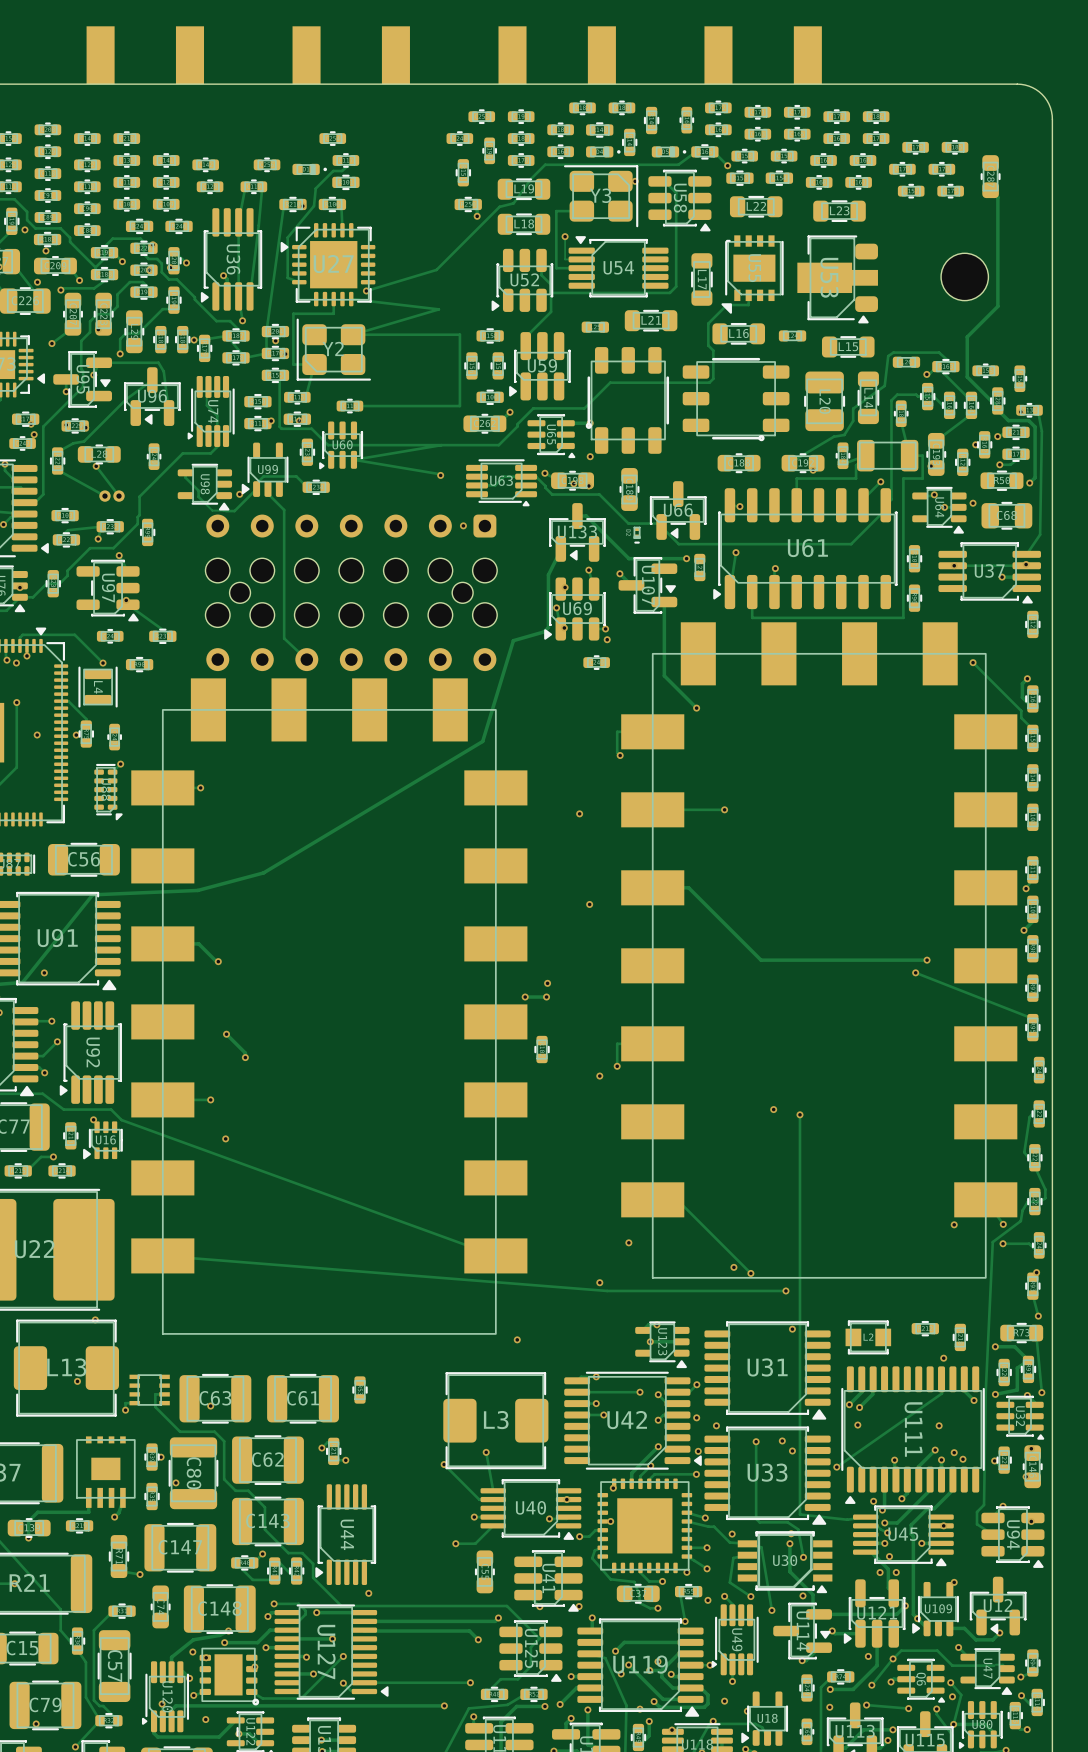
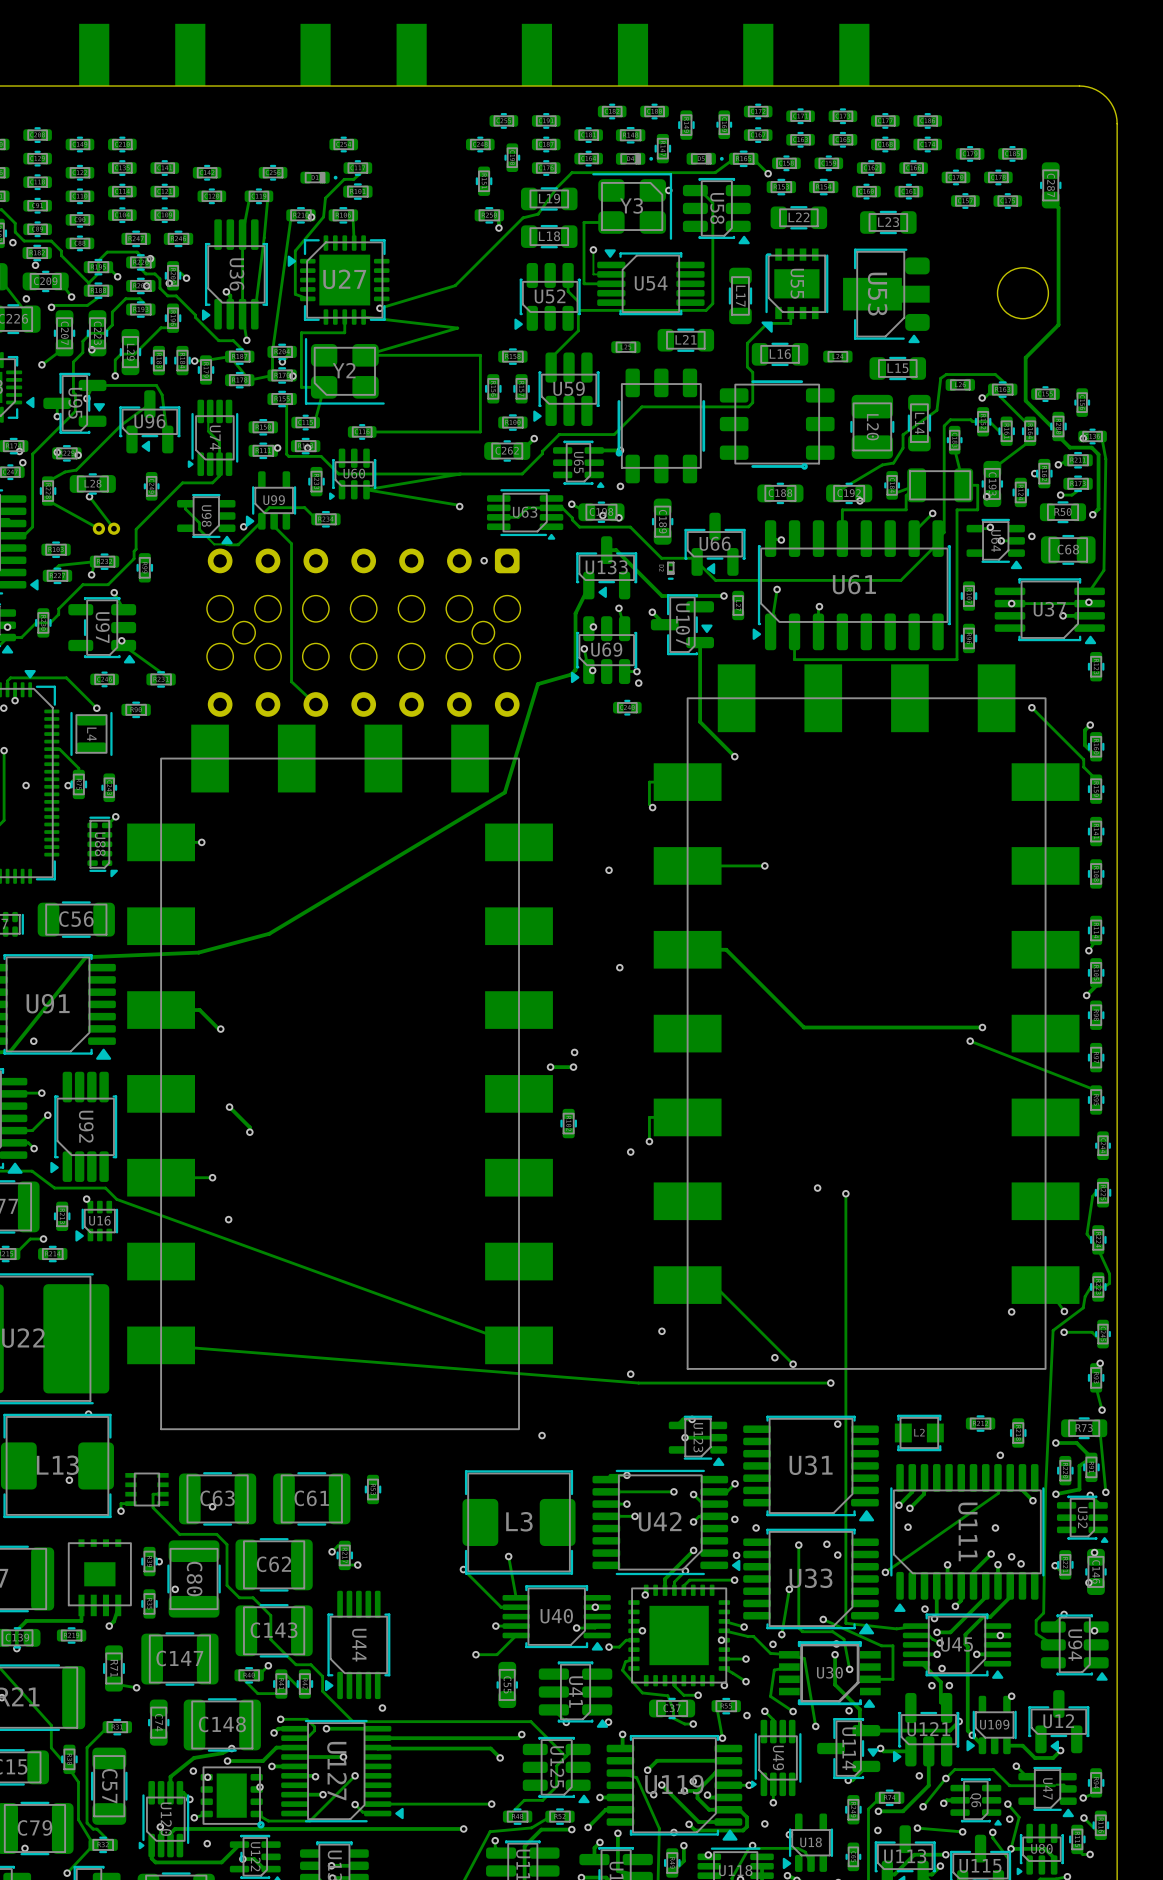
track: none -> (789, 1589) (781, 1637)
via: none -> (789, 1589)
track: none -> (823, 1619) (881, 1645) (892, 1645) (892, 1679) (870, 1679)
via: none -> (823, 1619)
via: none -> (781, 1634)
via: none -> (721, 1640)

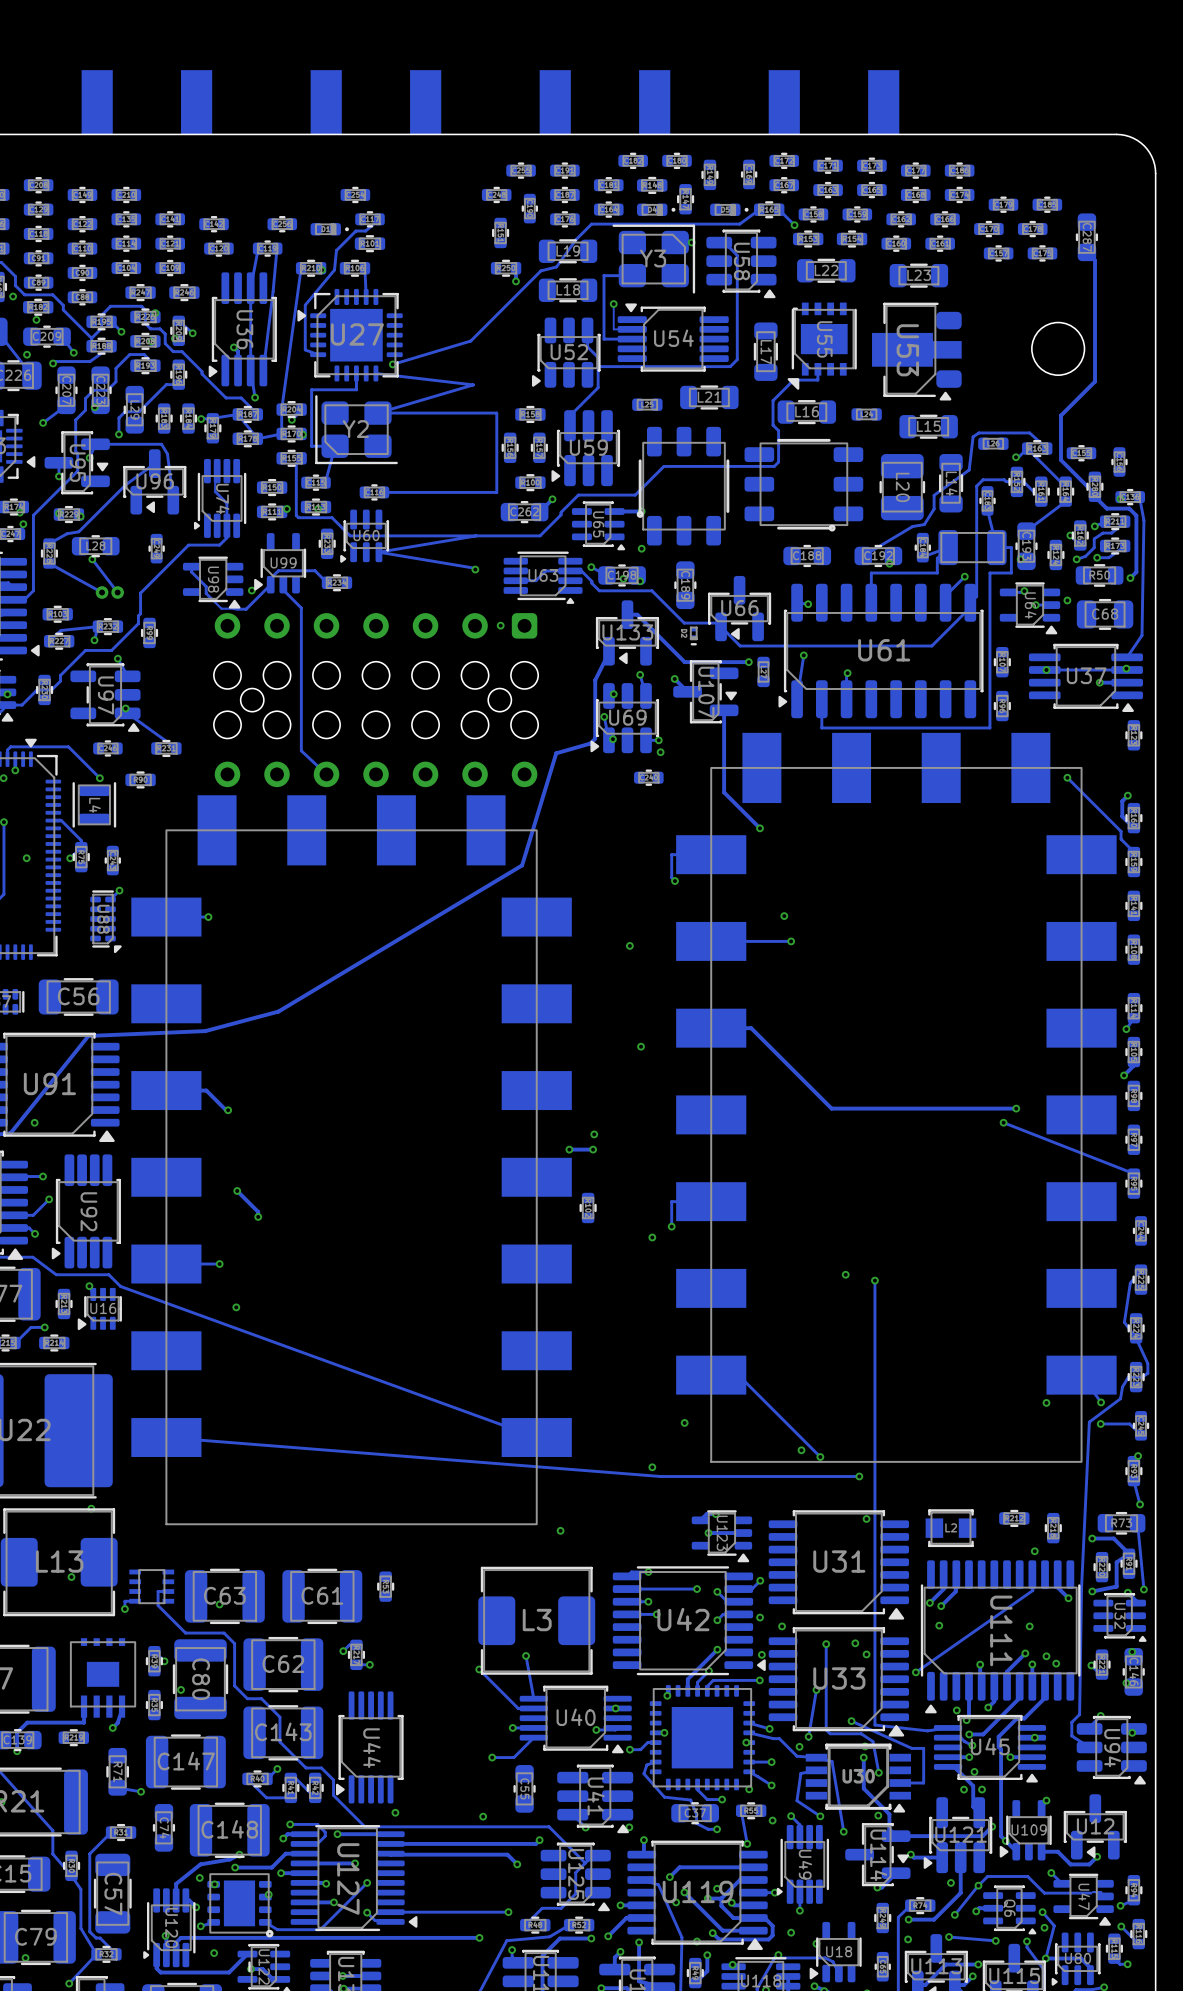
track: none -> (1125, 521) (1111, 533) (1103, 533) (1094, 538) (1094, 547) (1085, 556) (1076, 559)
via: none -> (1076, 559)
via: none -> (784, 916)
via: none -> (483, 1816)

